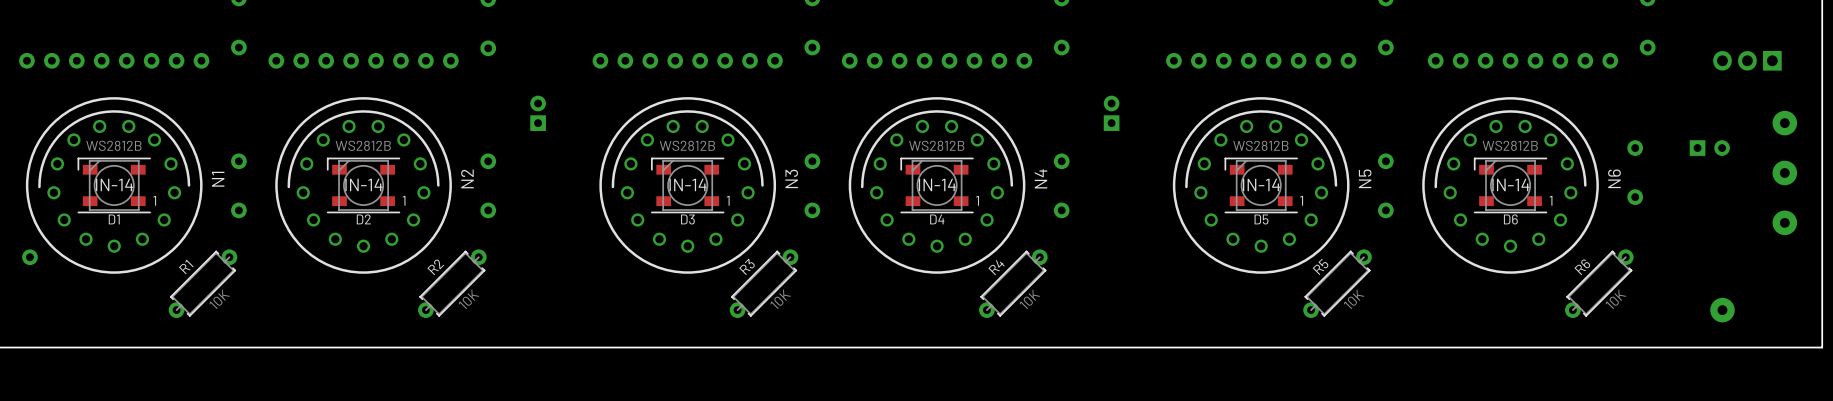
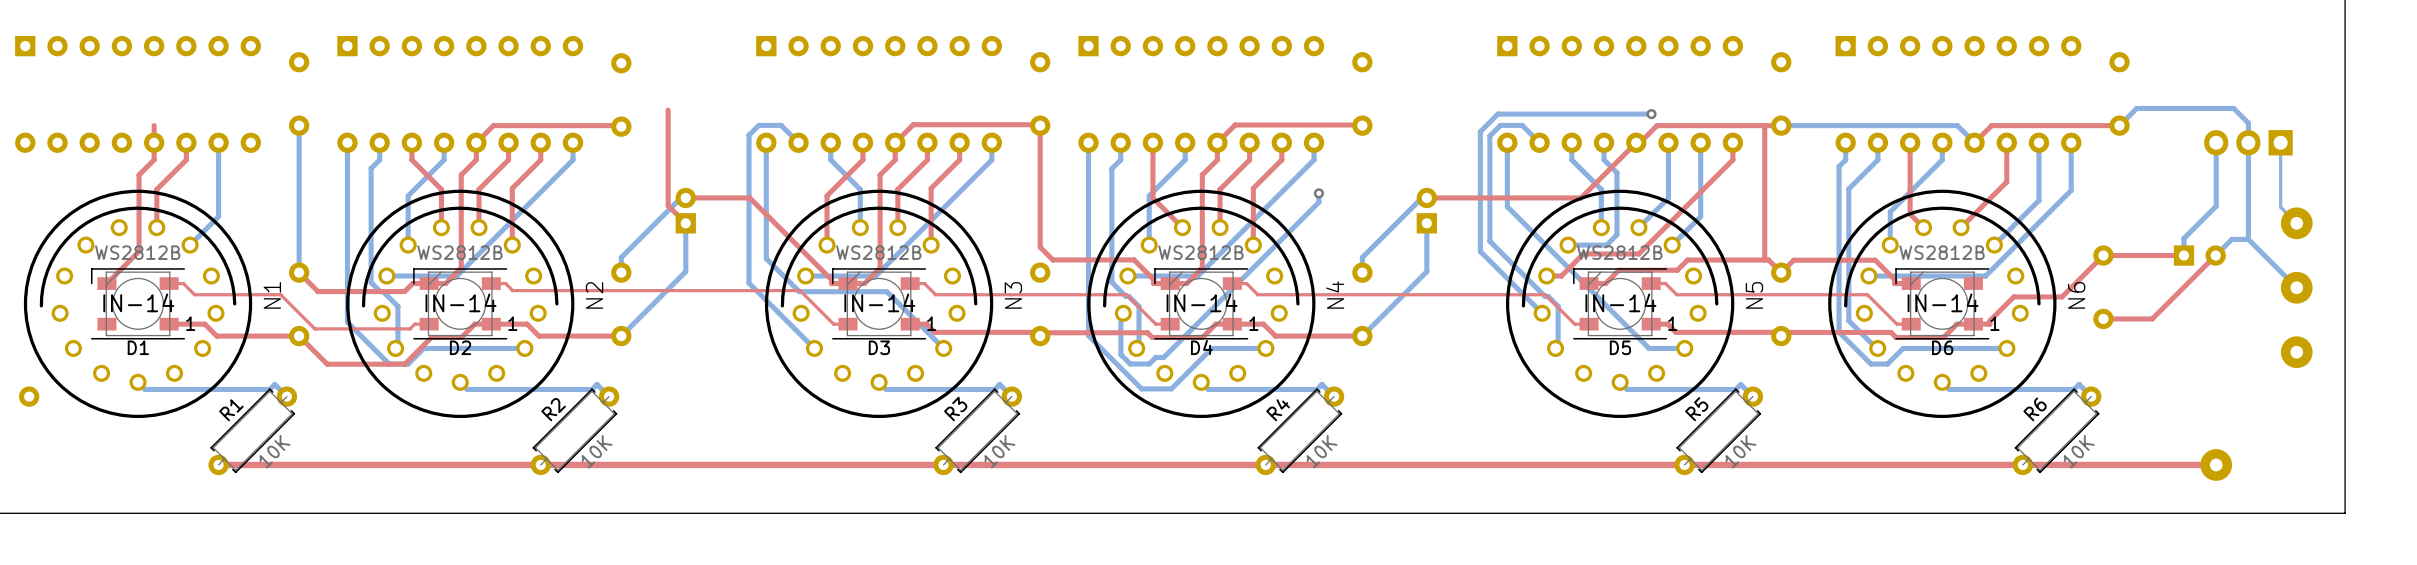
top track: none -> (668, 110) (668, 205) (685, 223)
bottom track: none -> (1651, 114) (1498, 114) (1480, 131) (1480, 251) (1542, 313)
via: none -> (1651, 114)
top track: none -> (154, 125) (154, 159) (139, 174) (139, 251) (106, 283)
bottom track: none -> (299, 125) (299, 272)
top track: none -> (1362, 125) (1235, 124) (1217, 142) (1217, 159) (1202, 174) (1202, 267) (1186, 283) (1153, 283) (1153, 279) (1134, 259) (1052, 259) (1040, 247) (1039, 124) (913, 124) (895, 142) (895, 159) (880, 174) (880, 267) (864, 283) (831, 283) (831, 279) (749, 197) (685, 197)
top track: none -> (1764, 125) (1764, 260)
top track: none -> (1781, 125) (1657, 125) (1639, 142) (1636, 142) (1581, 197) (1426, 197)
bottom track: none -> (1781, 125) (1957, 125) (1974, 142)
top track: none -> (2119, 125) (1991, 125) (1974, 142)
bottom track: none -> (2119, 125) (2136, 108) (2233, 108) (2248, 123) (2248, 239)
top track: none -> (621, 126) (493, 125) (476, 142) (476, 159) (461, 174) (461, 267) (445, 283) (412, 283) (404, 291) (318, 291) (299, 272)
top track: none -> (186, 142) (186, 159) (156, 189) (156, 227)
bottom track: none -> (218, 142) (218, 216) (190, 245)
bottom track: none -> (347, 142) (347, 322) (389, 363) (408, 363) (423, 348) (524, 348)
bottom track: none -> (379, 142) (379, 159) (371, 168) (371, 282) (397, 306) (397, 346) (395, 348)
top track: none -> (411, 142) (411, 159) (441, 189) (441, 227)
bottom track: none -> (444, 142) (444, 159) (408, 195) (408, 245)
top track: none -> (508, 142) (508, 159) (479, 189) (479, 227)
top track: none -> (540, 142) (540, 159) (512, 188) (512, 245)
bottom track: none -> (573, 142) (573, 159) (456, 276) (386, 276)
bottom track: none -> (766, 142) (766, 258) (799, 291) (886, 291) (943, 348)
bottom track: none -> (798, 142) (781, 125) (758, 125) (749, 135) (749, 283) (814, 348)
bottom track: none -> (830, 142) (830, 159) (860, 189) (860, 227)
top track: none -> (862, 142) (862, 159) (827, 195) (827, 245)
top track: none -> (927, 142) (927, 159) (897, 189) (897, 227)
top track: none -> (959, 142) (959, 159) (931, 188) (931, 245)
bottom track: none -> (991, 142) (991, 159) (875, 276) (805, 276)
bottom track: none -> (1088, 142) (1088, 335) (1141, 388) (1171, 388) (1211, 348) (1265, 348)
bottom track: none -> (1120, 142) (1120, 159) (1111, 168) (1111, 282) (1138, 306) (1138, 346) (1136, 348)
top track: none -> (1152, 142) (1152, 198) (1182, 227)
bottom track: none -> (1185, 142) (1185, 159) (1149, 195) (1149, 245)
top track: none -> (1249, 142) (1249, 159) (1220, 189) (1220, 227)
top track: none -> (1281, 142) (1281, 159) (1253, 188) (1253, 245)
bottom track: none -> (1314, 142) (1314, 159) (1197, 276) (1127, 276)
bottom track: none -> (1507, 142) (1507, 206) (1649, 348) (1684, 348)
bottom track: none -> (1539, 142) (1522, 125) (1500, 125) (1489, 135) (1489, 241) (1545, 296) (1548, 296) (1558, 306) (1558, 345) (1555, 348)
bottom track: none -> (1571, 142) (1571, 159) (1601, 189) (1601, 227)
bottom track: none -> (1604, 142) (1604, 159) (1616, 172) (1616, 234) (1606, 245) (1568, 245)
bottom track: none -> (1668, 142) (1668, 198) (1638, 227)
bottom track: none -> (1700, 142) (1700, 216) (1672, 245)
top track: none -> (1732, 142) (1732, 159) (1638, 253) (1583, 253) (1561, 276) (1546, 276)
bottom track: none -> (1845, 142) (1845, 159) (1839, 166) (1839, 332) (1870, 364) (1887, 364) (1903, 348) (2006, 348)
bottom track: none -> (1877, 142) (1877, 159) (1848, 188) (1848, 320) (1877, 348)
top track: none -> (1910, 142) (1910, 214) (1923, 227)
bottom track: none -> (1942, 142) (1942, 159) (1890, 211) (1890, 245)
top track: none -> (2006, 142) (2006, 181) (1961, 227)
bottom track: none -> (2038, 142) (2038, 200) (1994, 245)
bottom track: none -> (2071, 142) (2071, 190) (1985, 276) (1868, 276)
bottom track: none -> (2216, 142) (2216, 206) (2183, 238) (2183, 255)
bottom track: none -> (2280, 142) (2280, 207) (2296, 223)
bottom track: none -> (1318, 193) (1318, 202) (1163, 357) (1155, 357) (1149, 363) (1130, 363) (1120, 354) (1120, 315) (1123, 313)
via: none -> (1318, 193)
bottom track: none -> (685, 197) (680, 197) (621, 257) (621, 272)
bottom track: none -> (1426, 197) (1421, 197) (1362, 257) (1362, 272)
bottom track: none -> (685, 223) (685, 271) (621, 336)
bottom track: none -> (1426, 223) (1426, 271) (1362, 336)
bottom track: none -> (2248, 239) (2231, 239) (2215, 255)
bottom track: none -> (2248, 239) (2296, 287)
top track: none -> (2183, 255) (2103, 255) (2062, 296) (2013, 296) (1989, 320) (1989, 324) (1956, 324) (1943, 337) (1896, 337) (1891, 332) (1784, 332) (1781, 336) (1777, 332) (1675, 332) (1667, 324) (1651, 324)
top track: none -> (2215, 255) (2152, 318) (2103, 318)
top track: none -> (169, 283) (183, 283) (194, 294) (280, 294) (314, 328) (410, 328) (414, 324) (429, 324)
top track: none -> (491, 283) (505, 283) (512, 290) (800, 290) (833, 324) (848, 324)
top track: none -> (910, 283) (924, 283) (935, 294) (1126, 294) (1155, 324) (1170, 324)
top track: none -> (1232, 283) (1246, 283) (1257, 294) (1545, 294) (1574, 324) (1589, 324)
top track: none -> (1589, 283) (1605, 283) (1618, 270) (1677, 270) (1687, 260) (1768, 260) (1781, 272) (1793, 260) (1875, 260) (1894, 279) (1894, 283) (1911, 283)
top track: none -> (1651, 283) (1665, 283) (1676, 294) (1867, 294) (1896, 324) (1911, 324)
top track: none -> (169, 324) (204, 324) (216, 336) (299, 336) (327, 364) (404, 364) (431, 337) (461, 337) (474, 324) (527, 324) (539, 336) (621, 336)
top track: none -> (910, 324) (926, 324) (934, 332) (1036, 332) (1040, 336) (1043, 332) (1147, 332) (1152, 337) (1202, 337) (1215, 324) (1263, 324) (1275, 336) (1362, 336)
bottom track: none -> (138, 382) (145, 389) (269, 389) (274, 384) (286, 396)
bottom track: none -> (460, 382) (467, 389) (592, 389) (597, 384) (609, 396)
bottom track: none -> (879, 382) (886, 389) (994, 389) (999, 384) (1011, 396)
bottom track: none -> (1201, 382) (1208, 389) (1316, 389) (1321, 384) (1334, 396)
bottom track: none -> (1620, 382) (1627, 389) (1735, 389) (1740, 384) (1752, 396)
bottom track: none -> (1942, 382) (1949, 389) (2074, 389) (2079, 384) (2091, 396)
top track: none -> (218, 464) (2216, 464)

